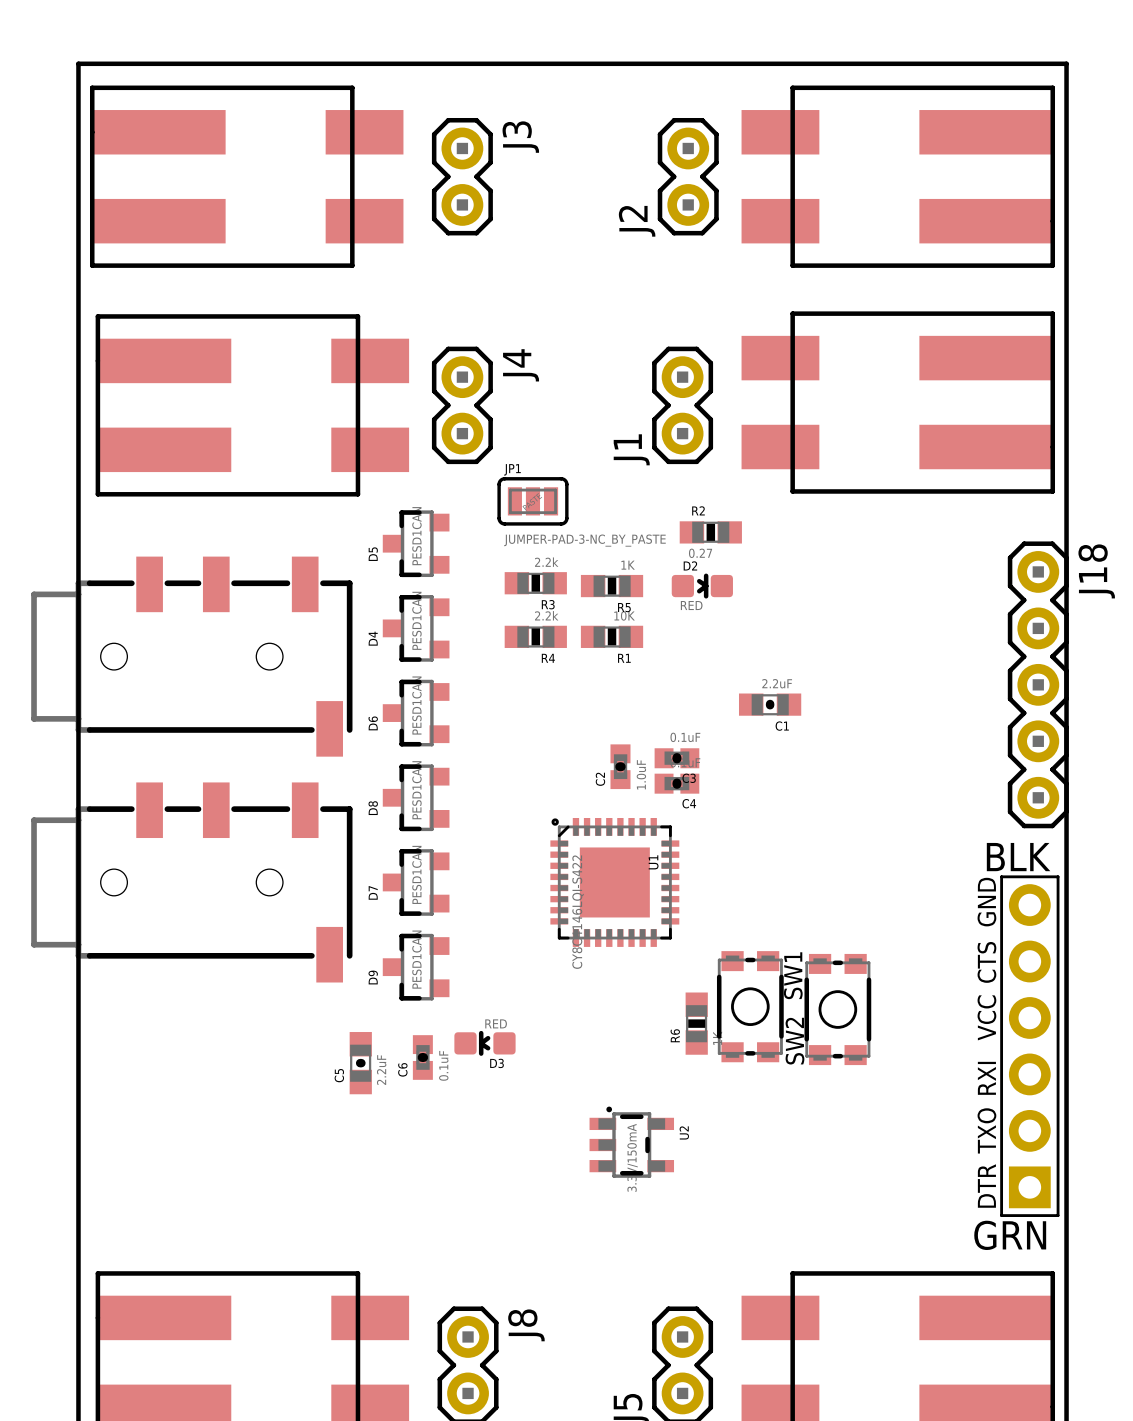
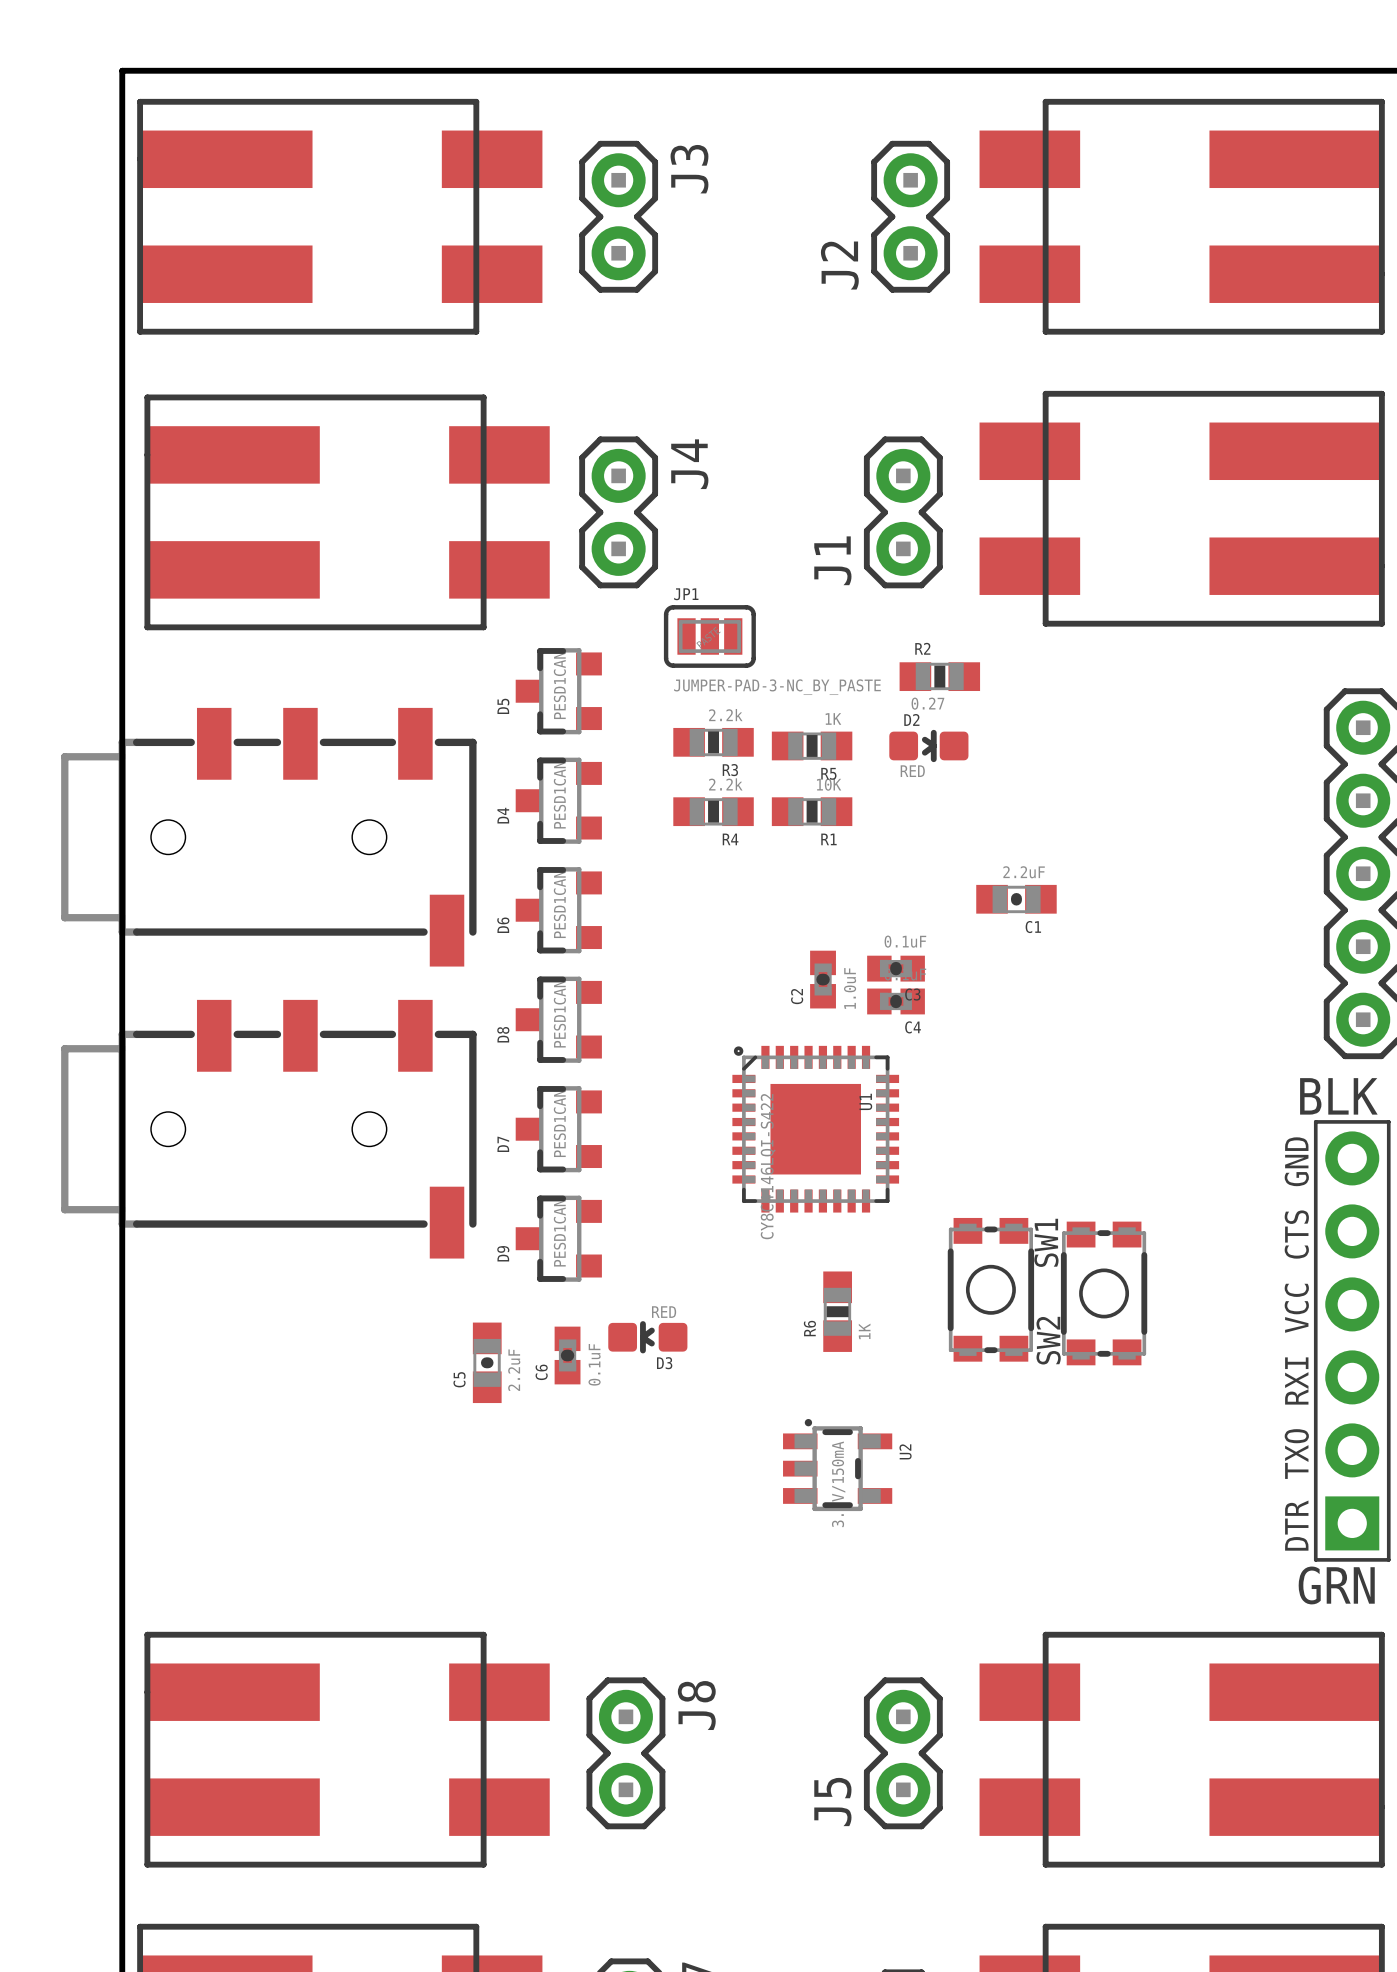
R6 position: (696, 1023) -> (837, 1311)

